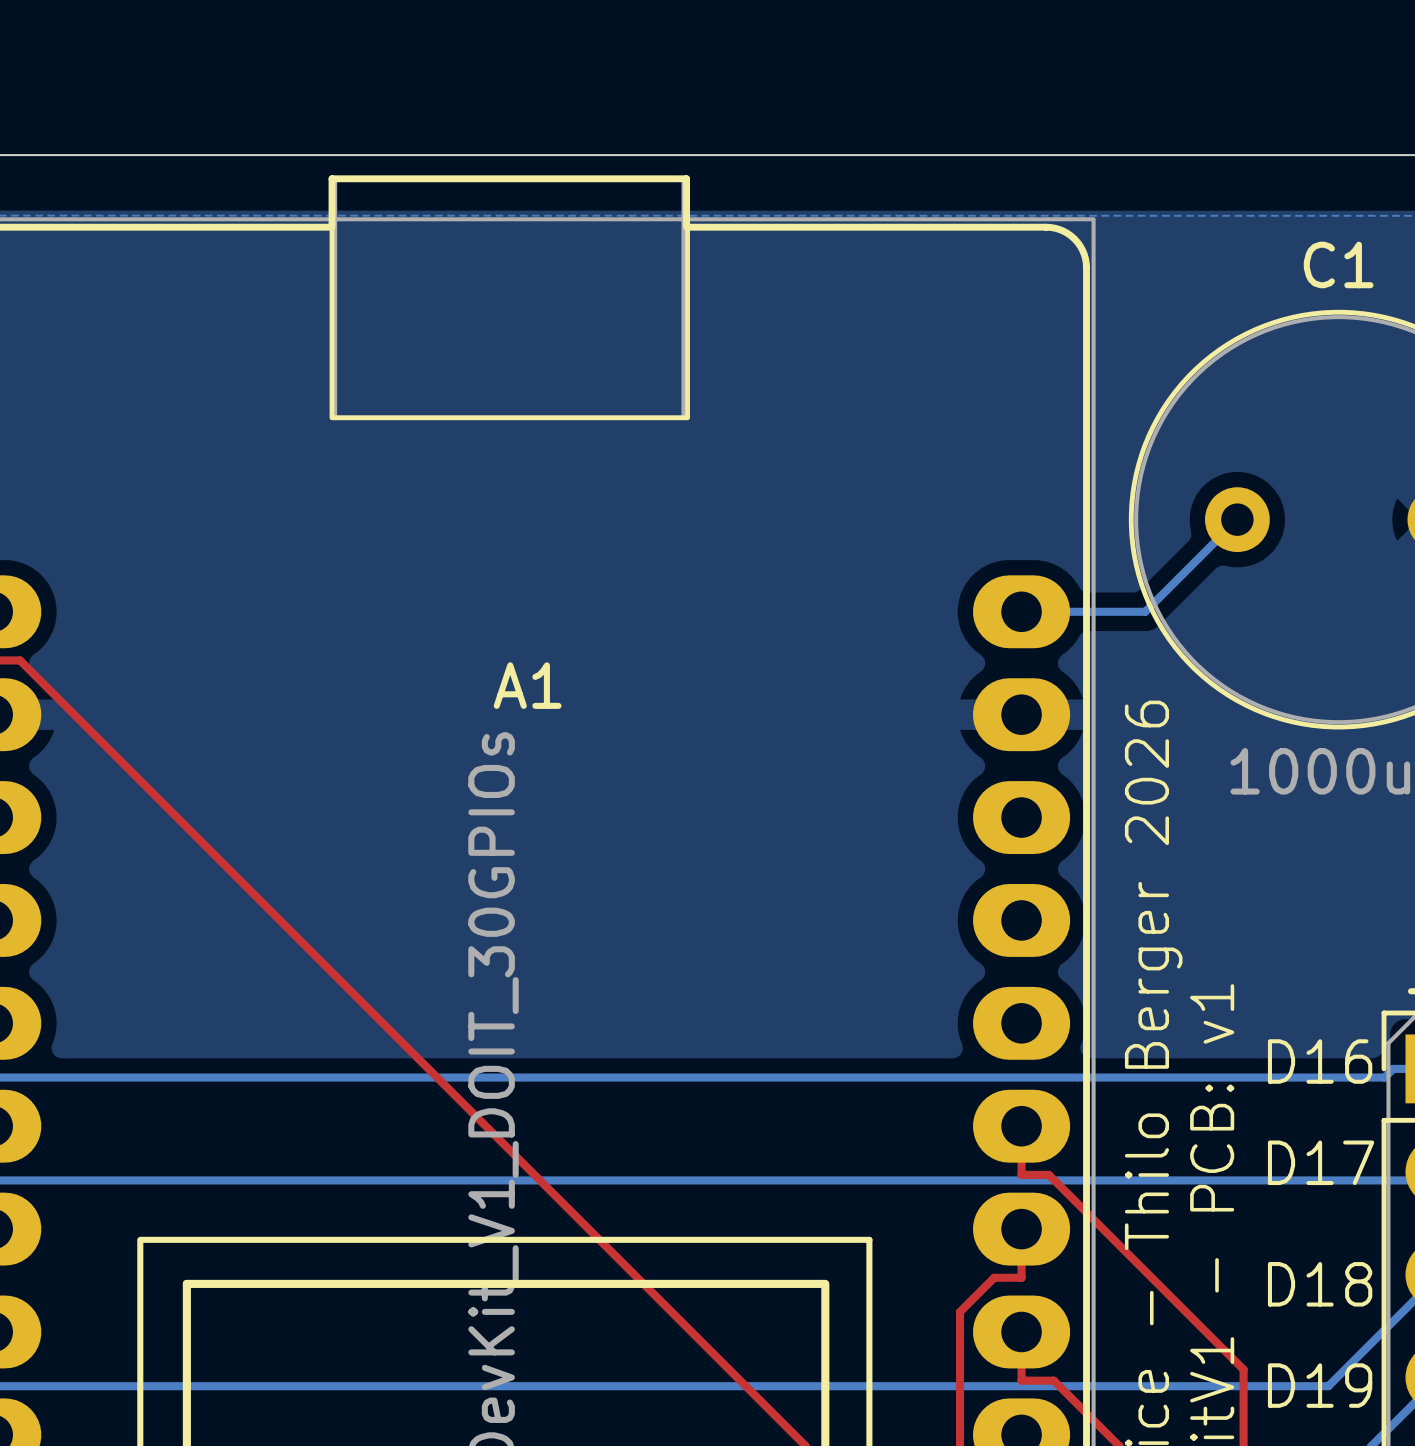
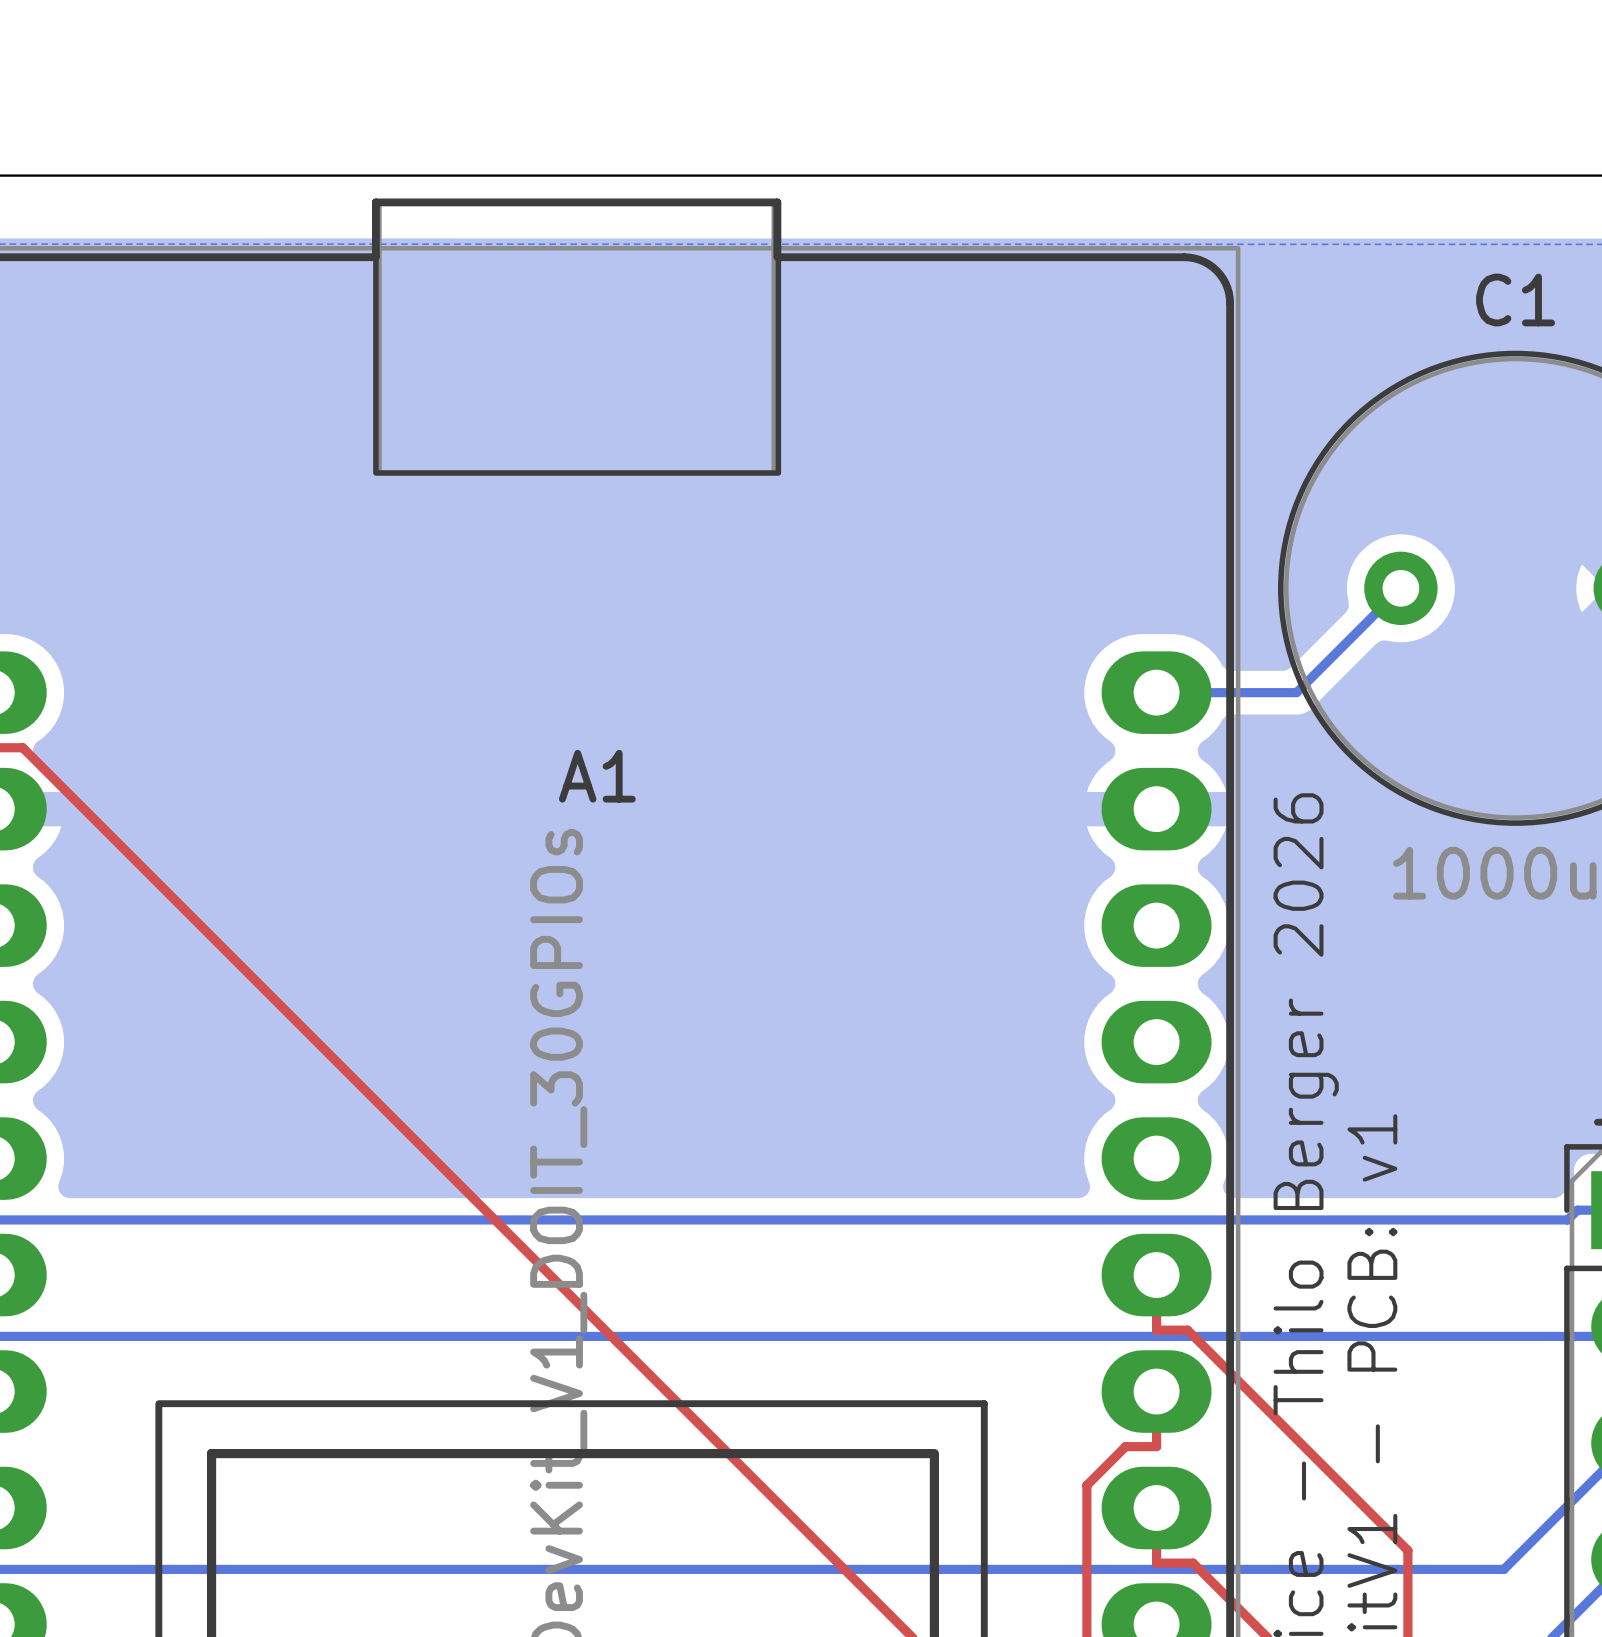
text: D16 (1320, 1061) -> none
text: D17 (1321, 1162) -> none
text: D18 (1320, 1284) -> none
text: D19 (1320, 1385) -> none

